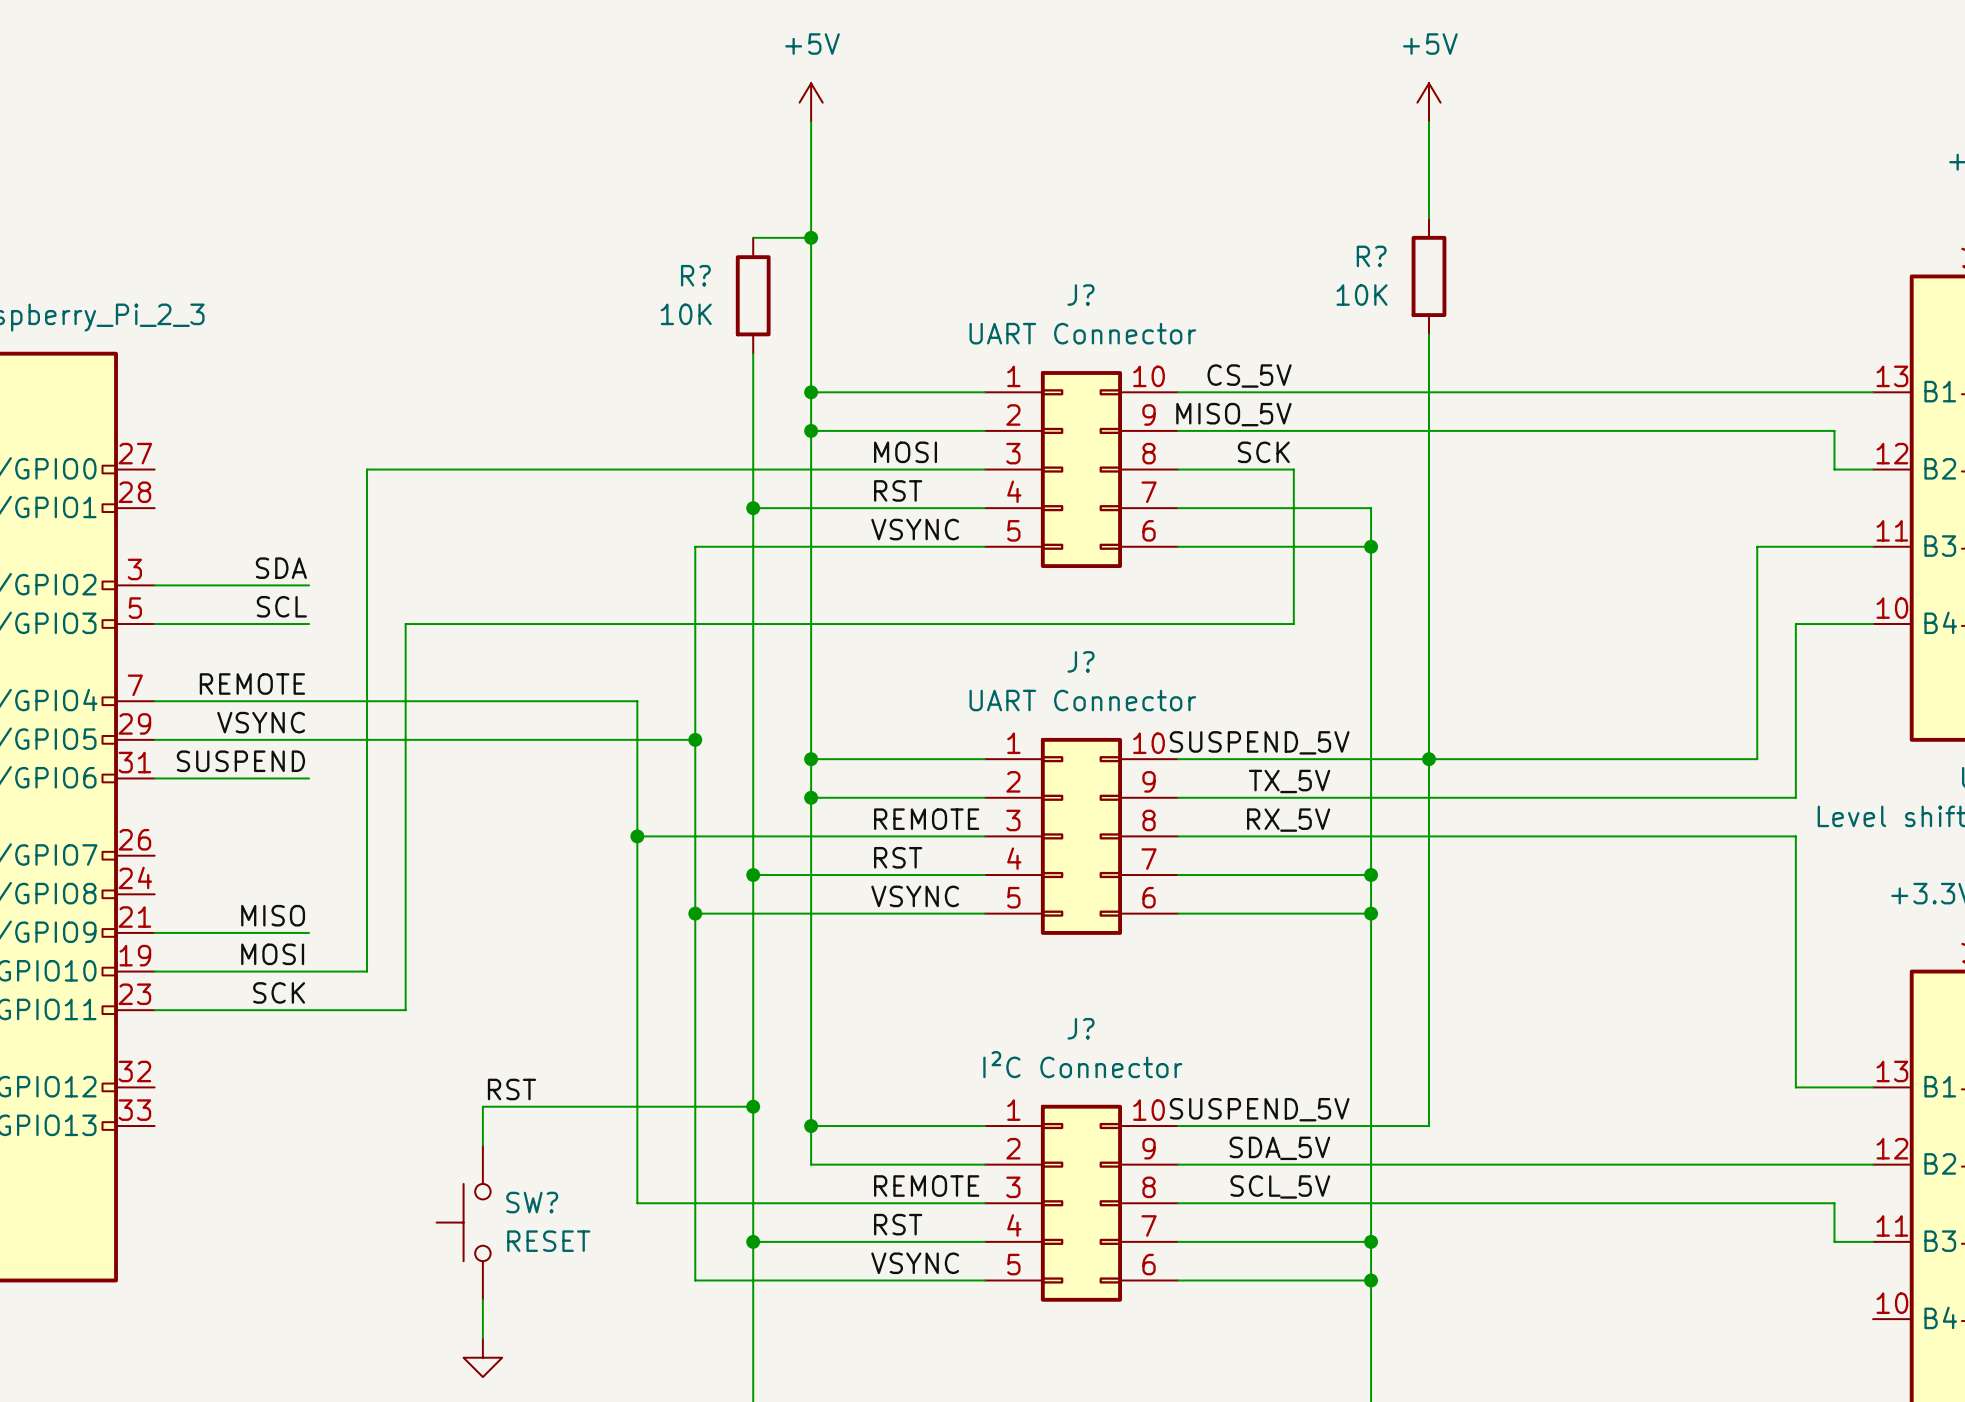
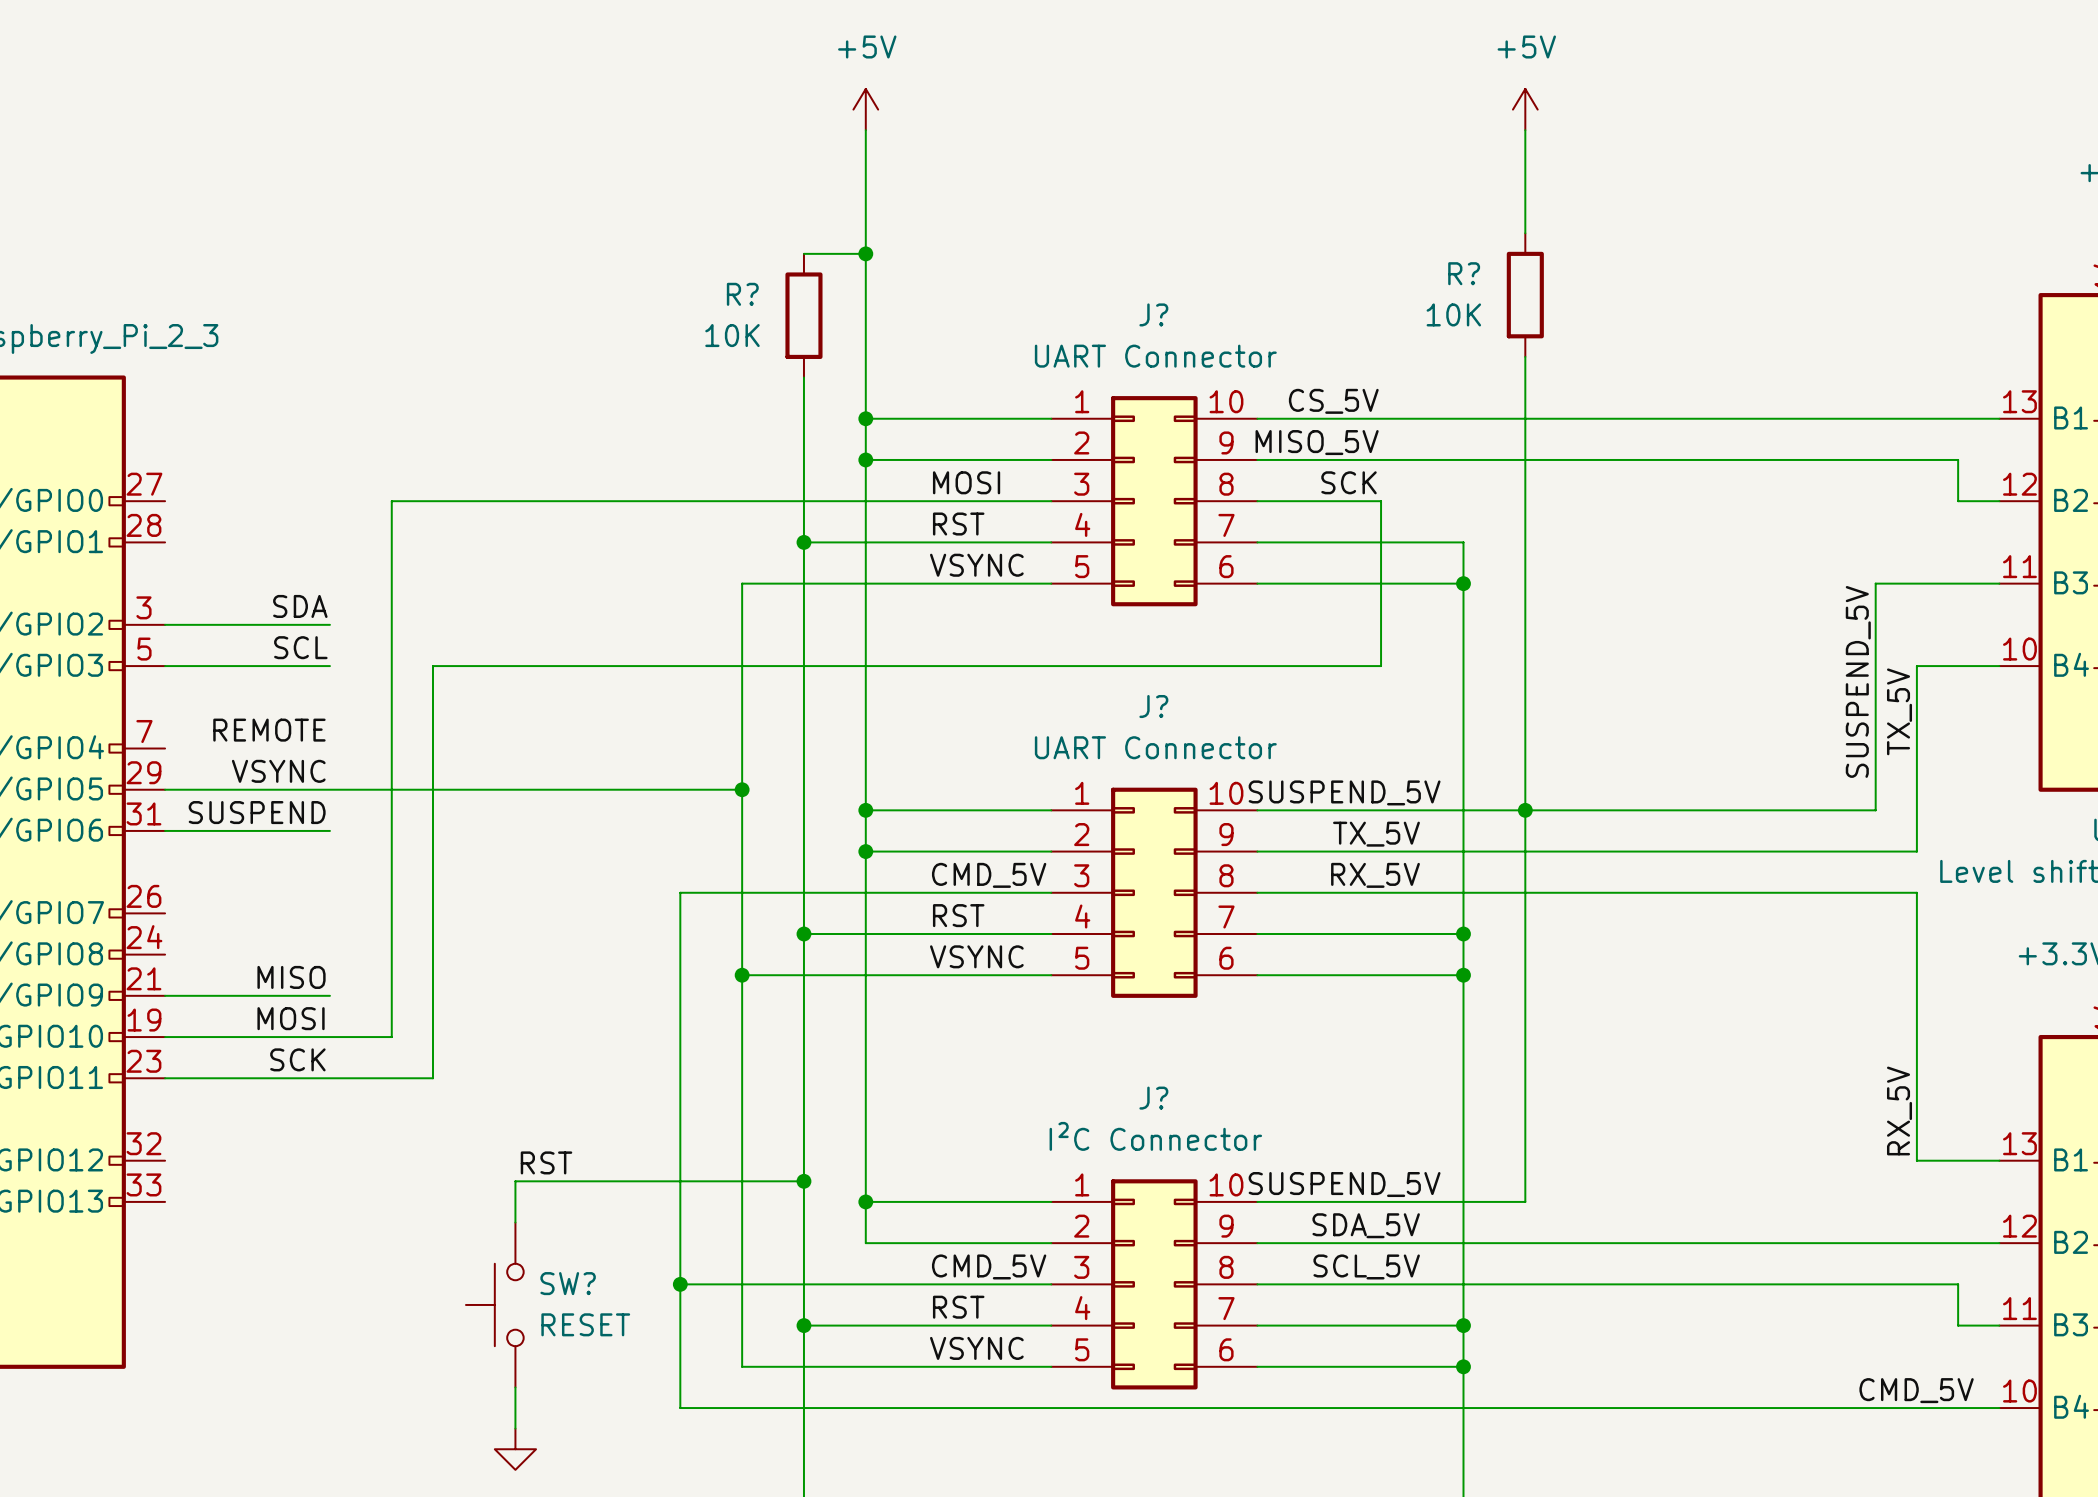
label: none -> SUSPEND_5V (1858, 681)
label: none -> TX_5V (1899, 711)
wire: (154, 701) (637, 701) (637, 836) -> none
label: REMOTE (926, 819) -> CMD_5V (989, 875)
junction: (637, 836) -> none
label: none -> RX_5V (1899, 1110)
label: REMOTE (926, 1186) -> CMD_5V (989, 1266)
wire: none -> (680, 1284) (680, 1408) (1999, 1408)
junction: none -> (680, 1284)
label: none -> CMD_5V (1916, 1390)

